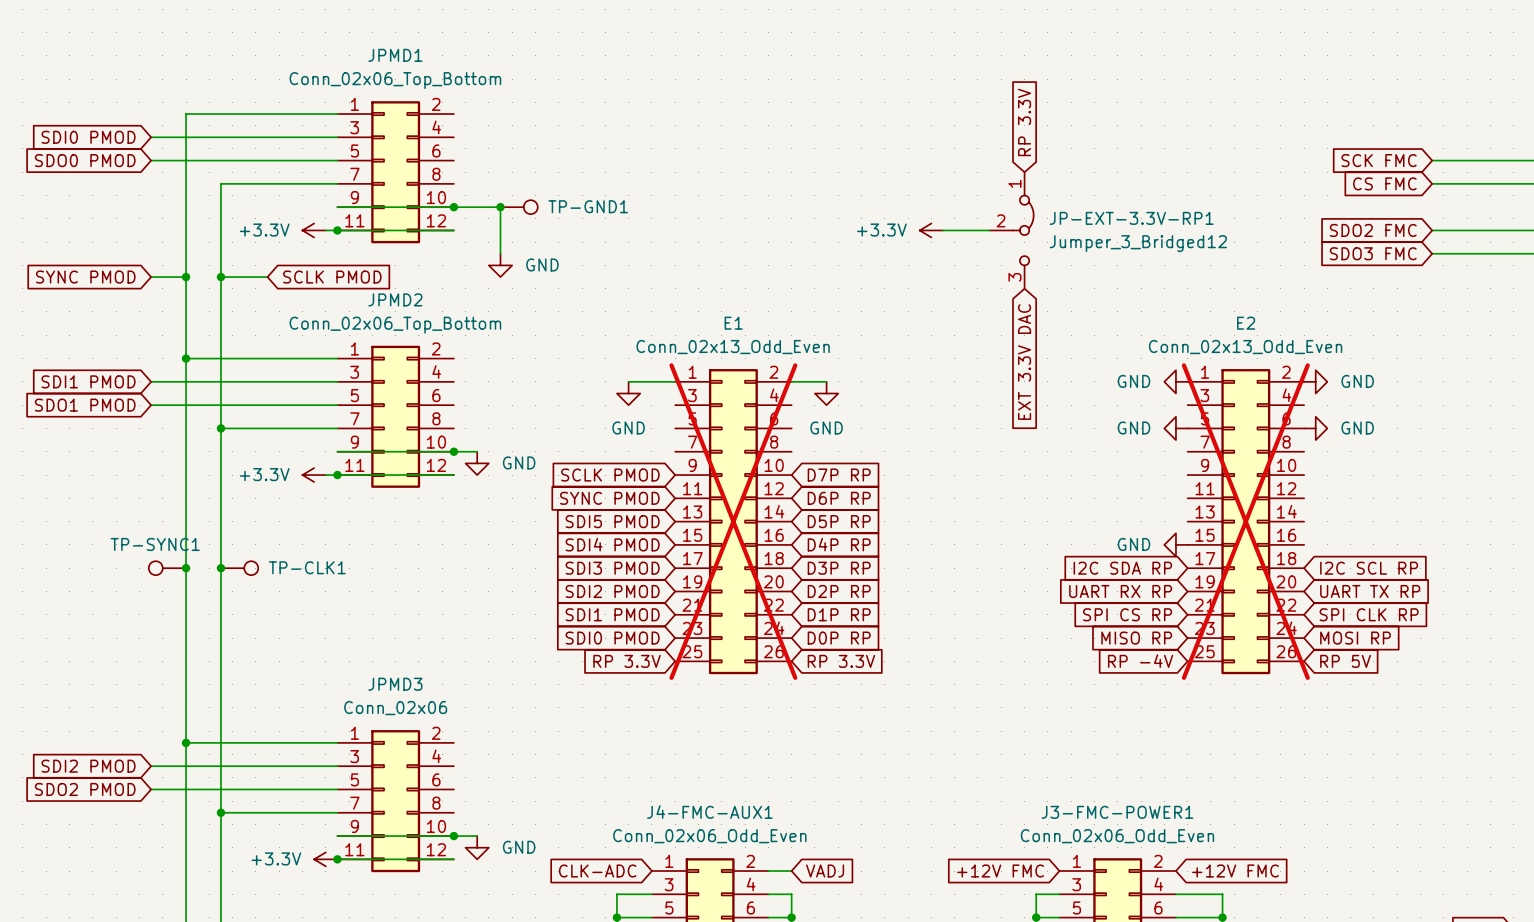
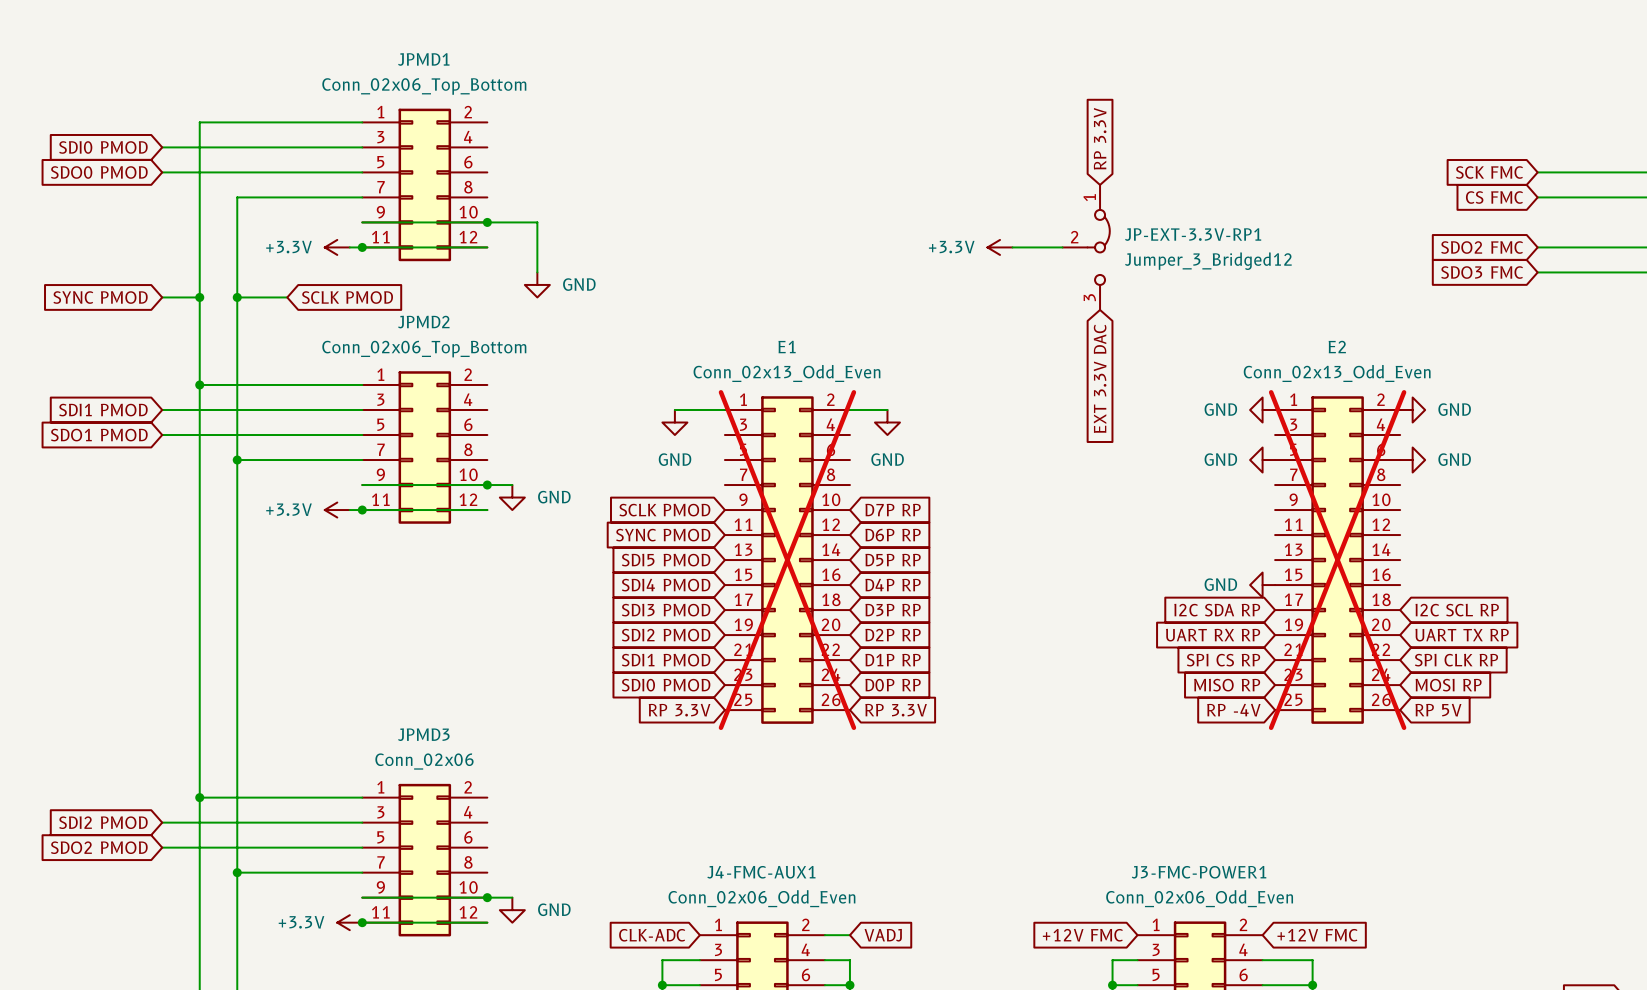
junction: (500, 207) -> none
TP-GND1: (519, 207) -> none
TP-SYNC1: (167, 568) -> none
junction: (186, 568) -> none
junction: (220, 568) -> none
TP-CLK1: (239, 568) -> none

